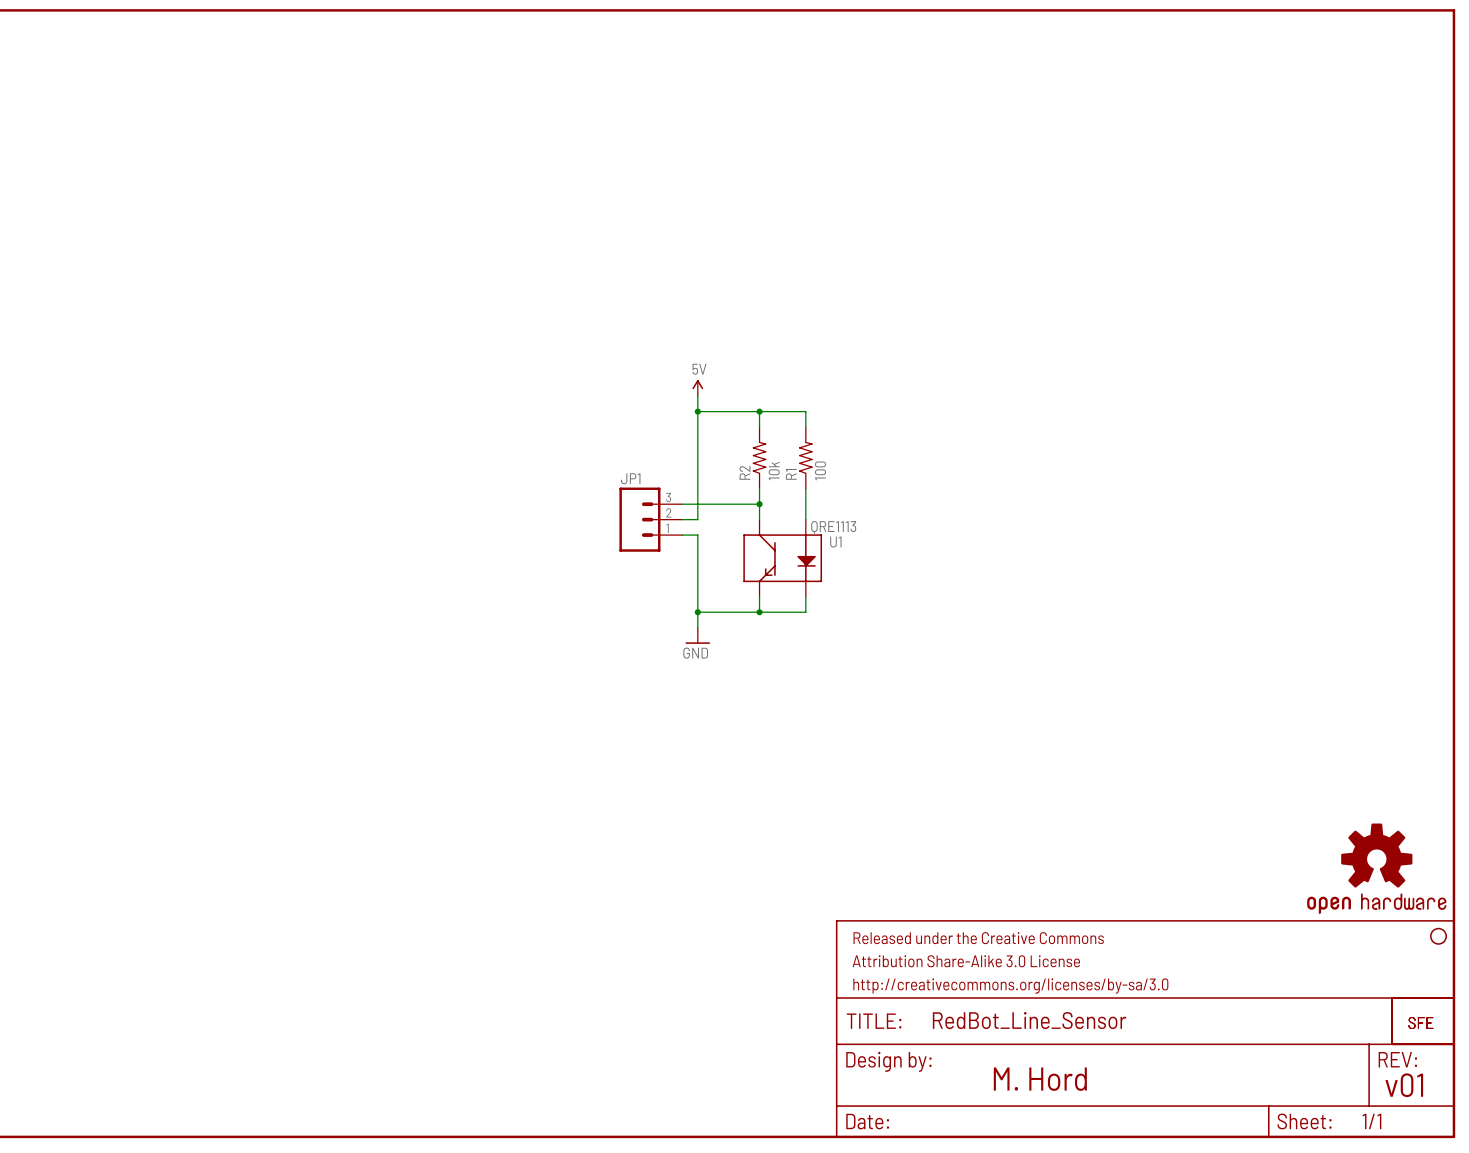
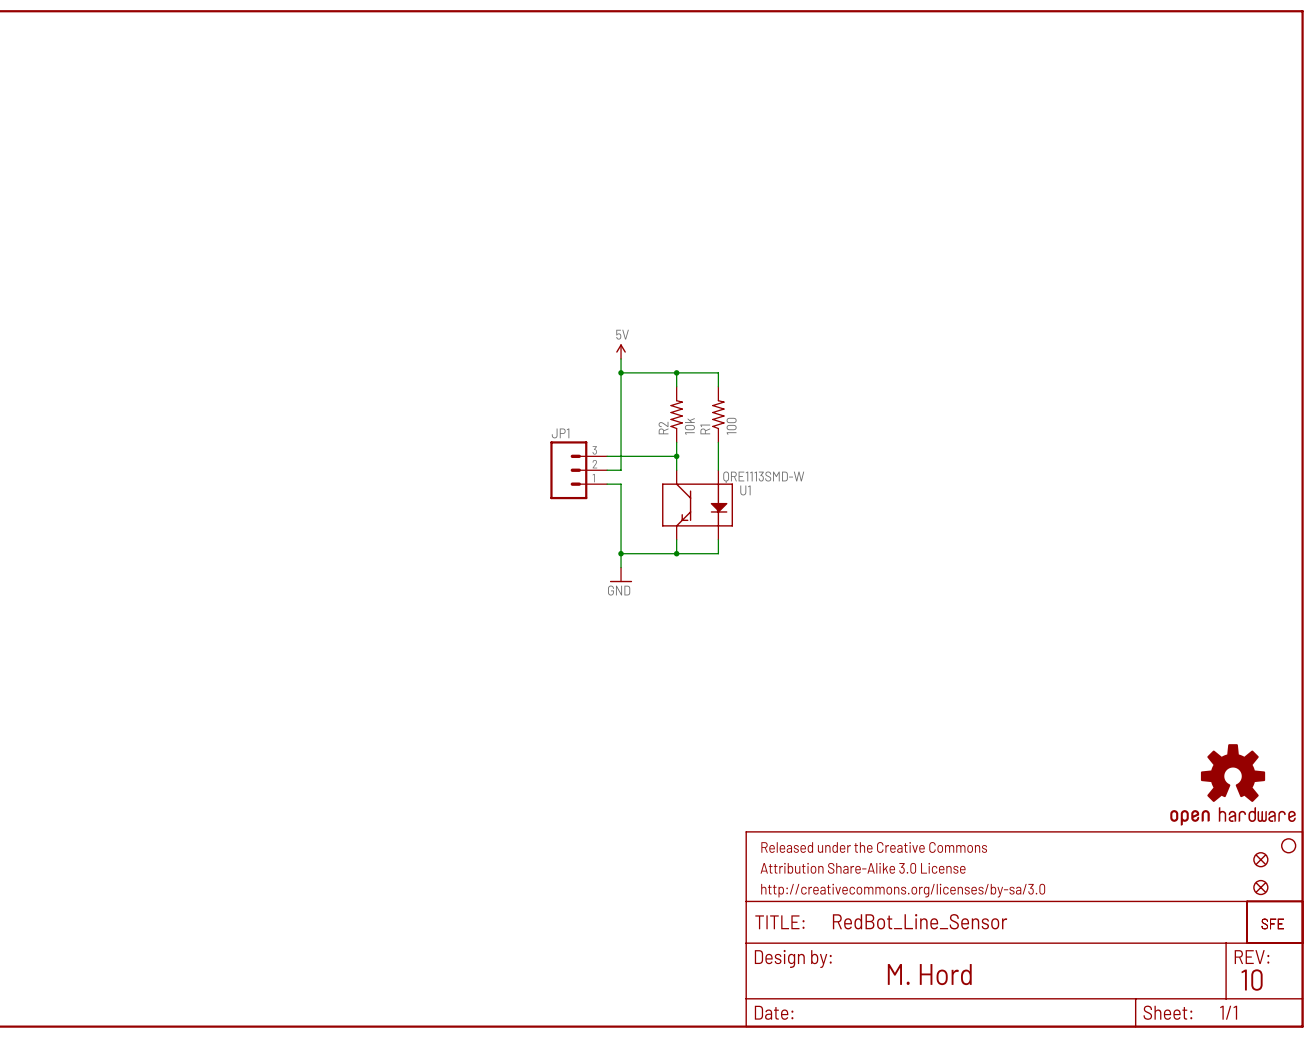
U1 value: QRE1113 (833, 527) -> QRE1113SMD-W (763, 477)
part: none -> (1260, 859)
part: none -> (1260, 887)
text: v01 (1404, 1085) -> 10 (1252, 980)

